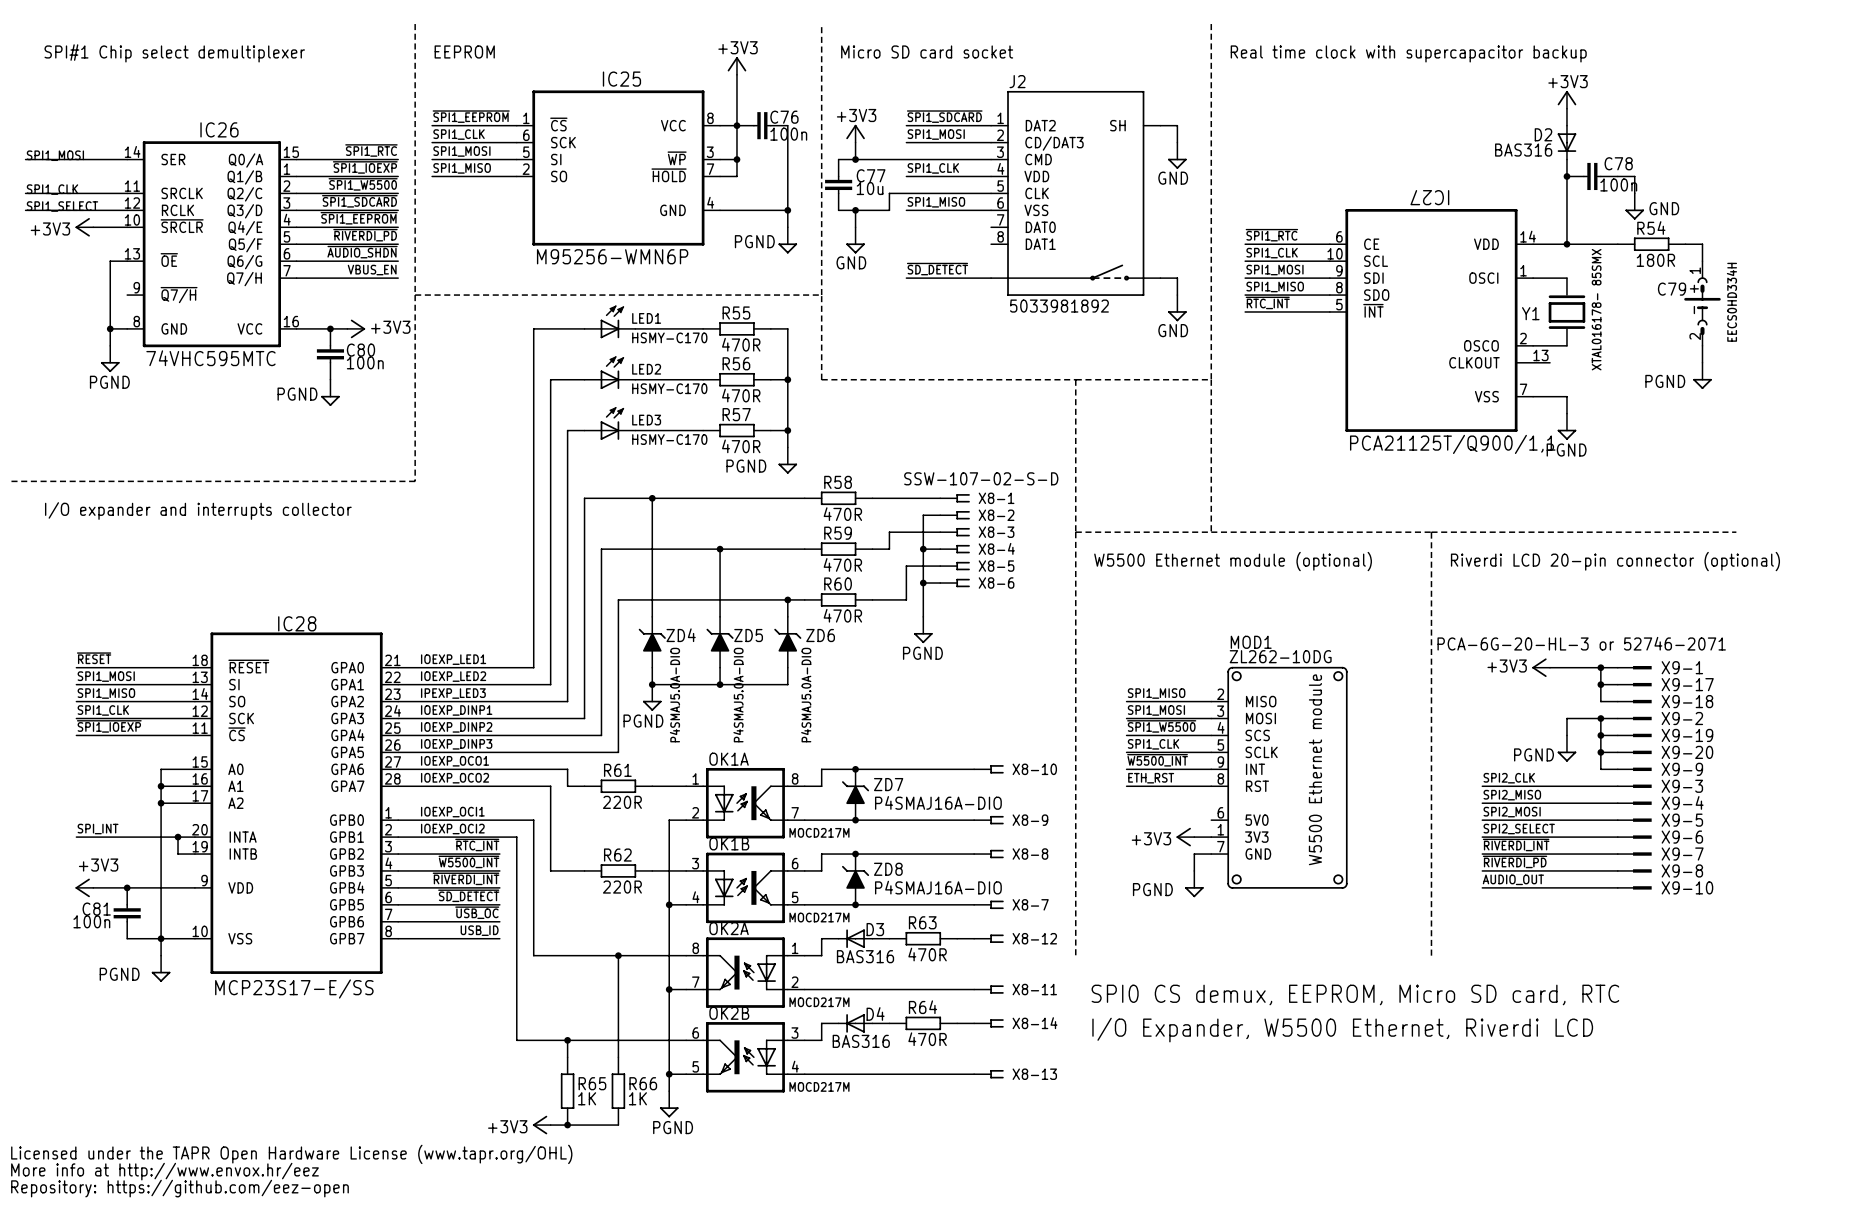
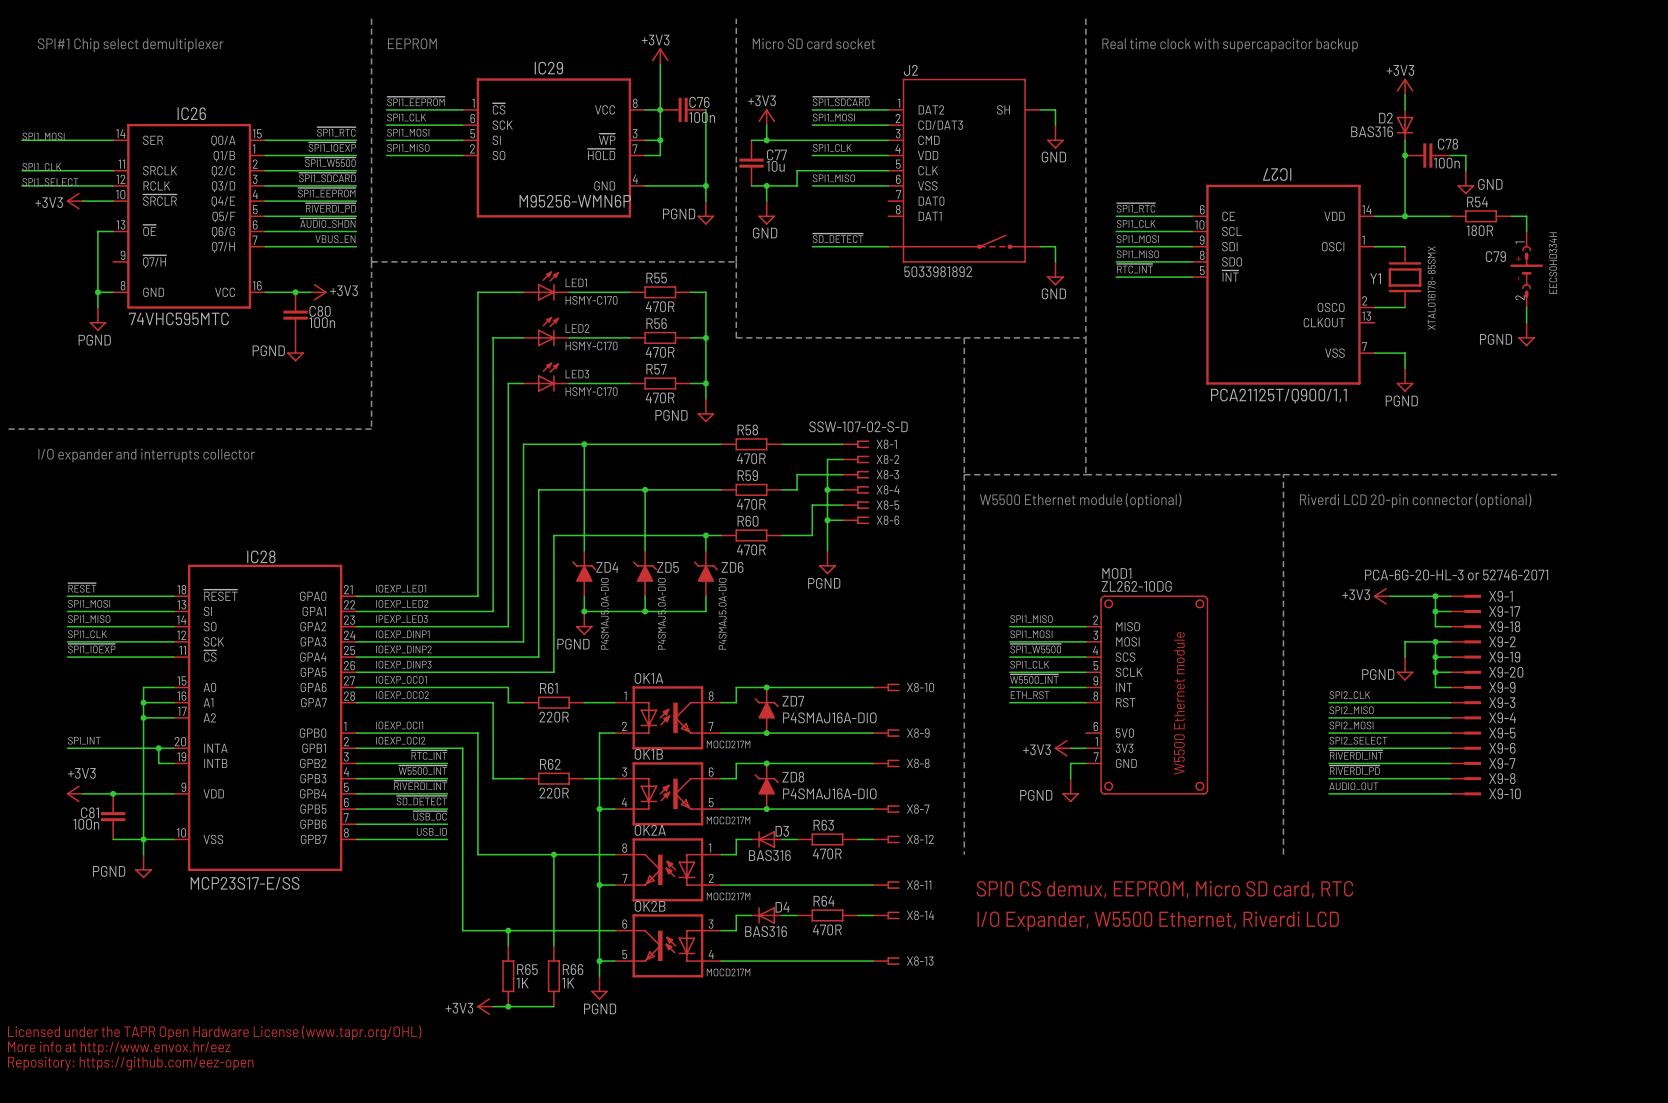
IC25 name: IC25 (621, 79) -> IC29 (548, 68)
IC27 symbol: [1329, 209, 1551, 432] -> [1192, 184, 1375, 385]
IC25 value position: M95256-WMN6P (612, 256) -> M95256-WMN6P (575, 201)

